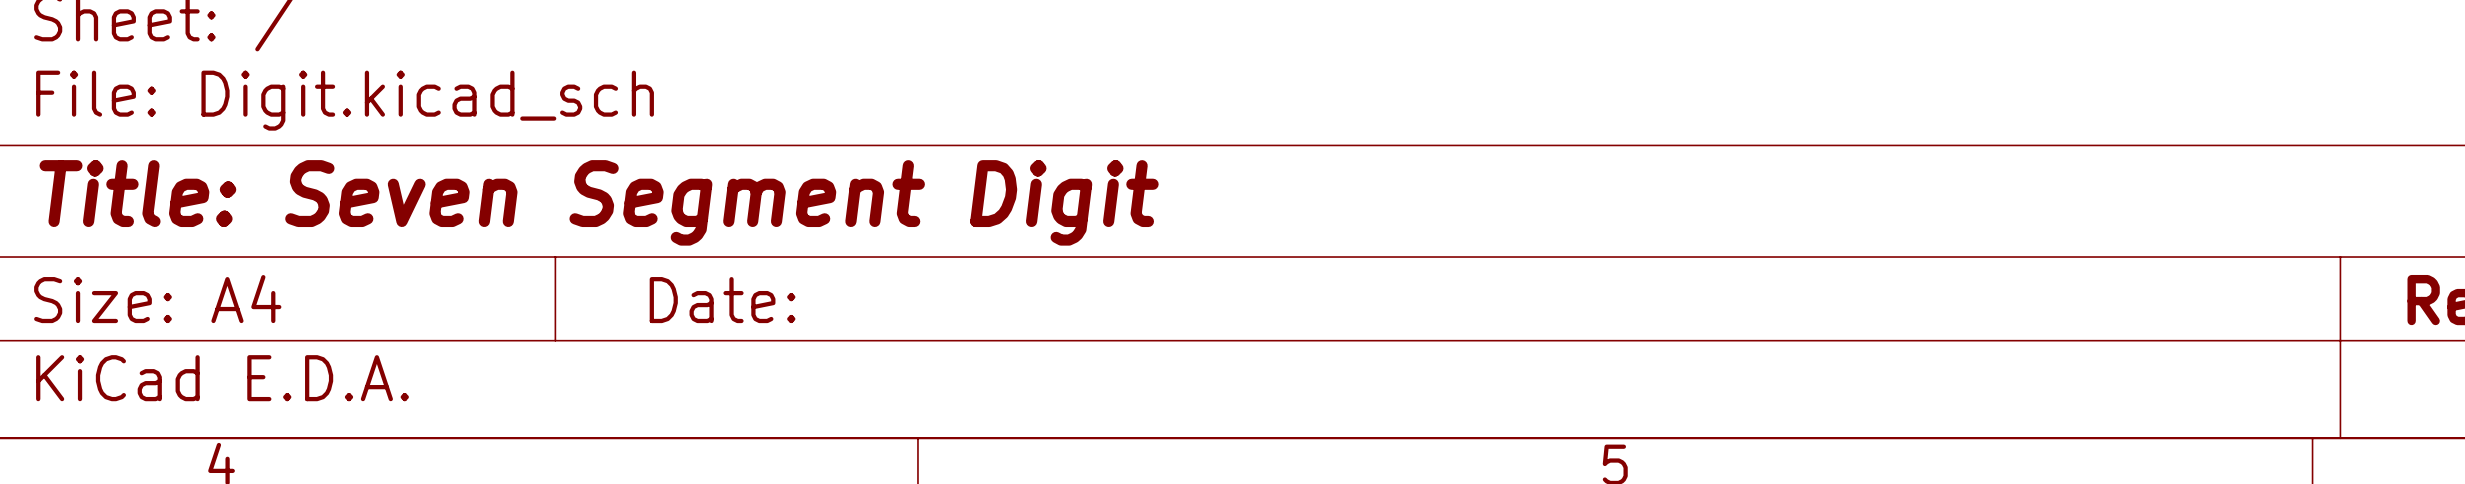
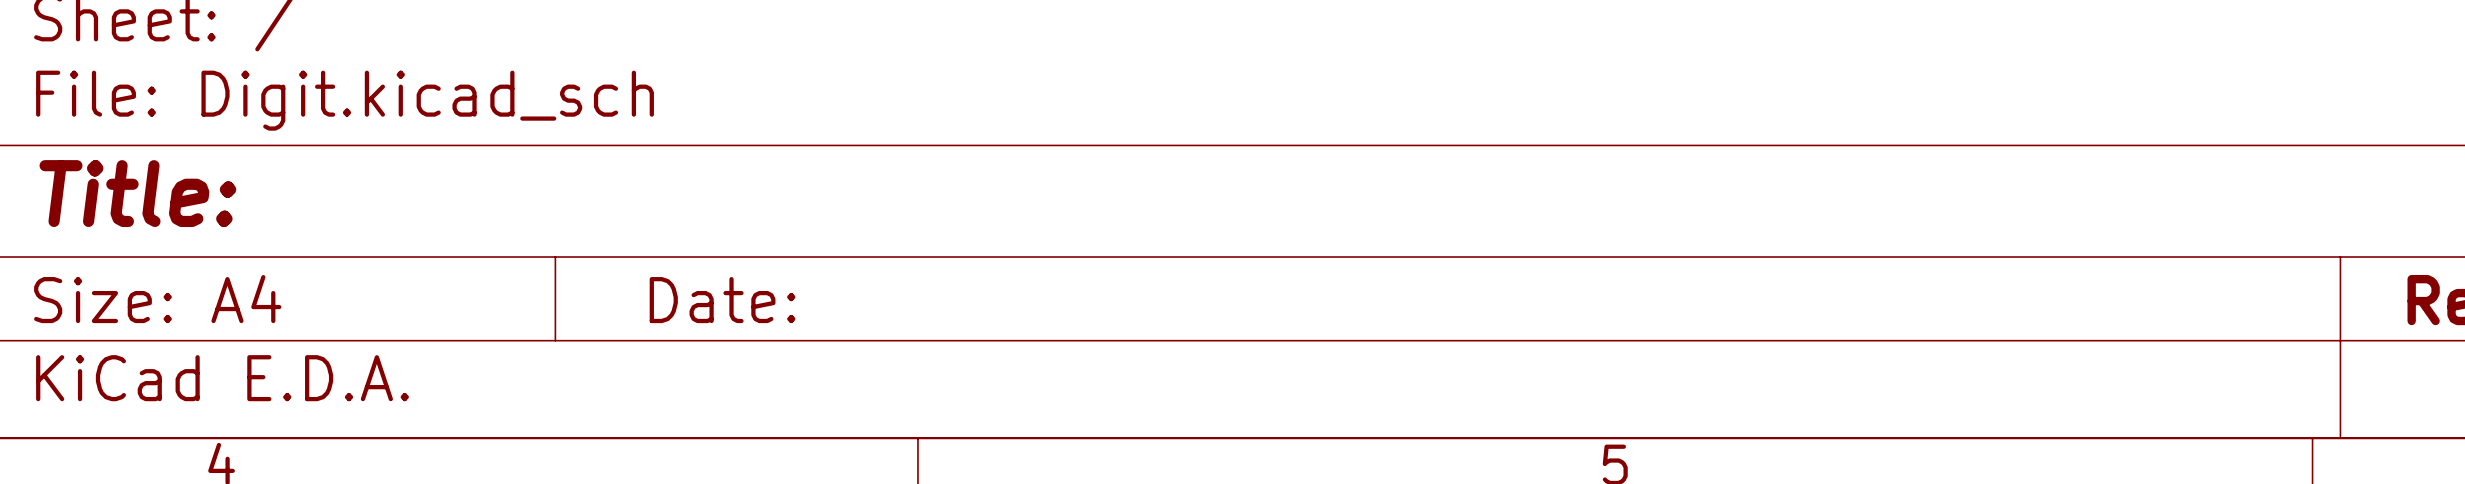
title block: Title: Seven Segment Digit (599, 202) -> Title: (137, 193)

